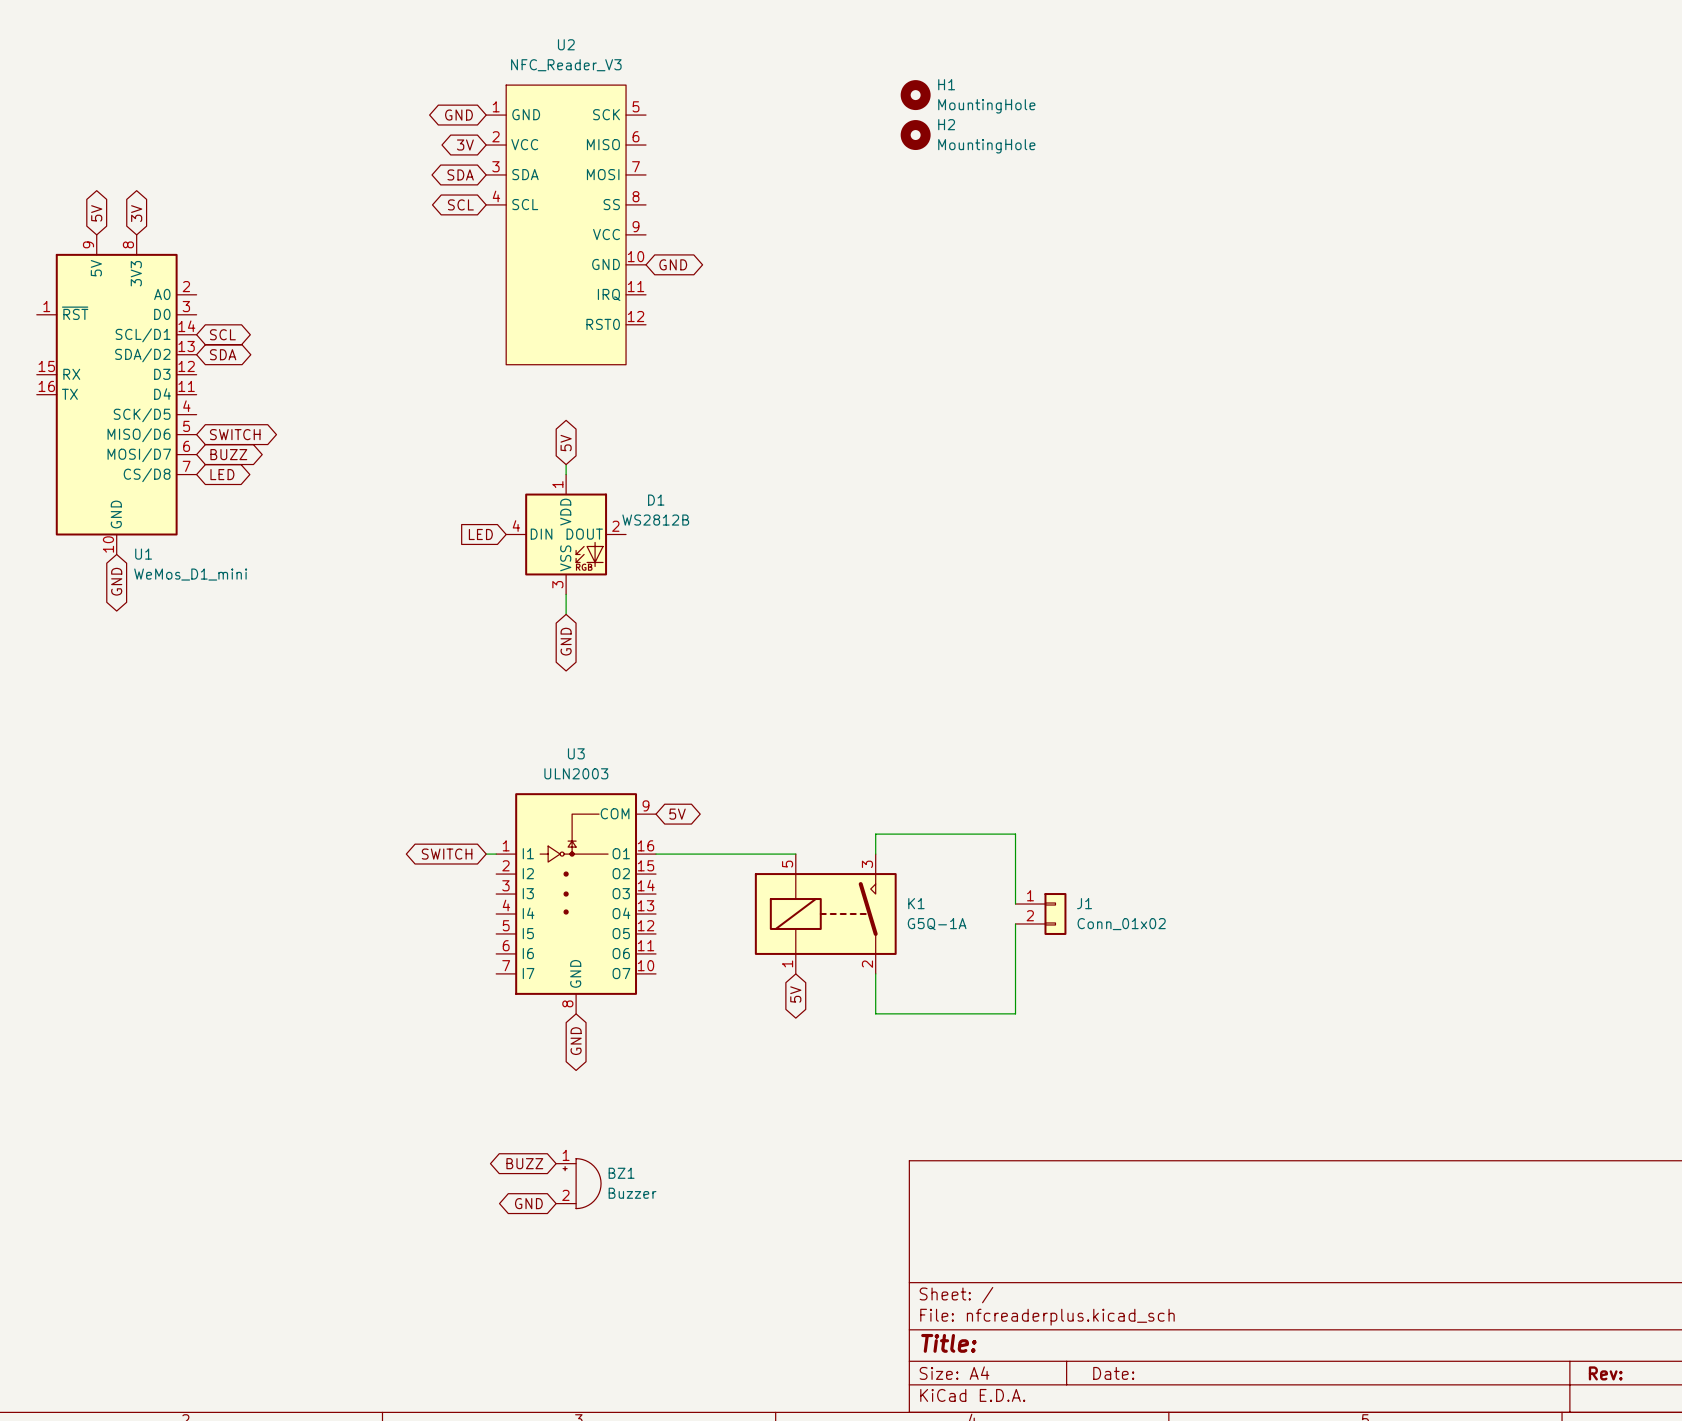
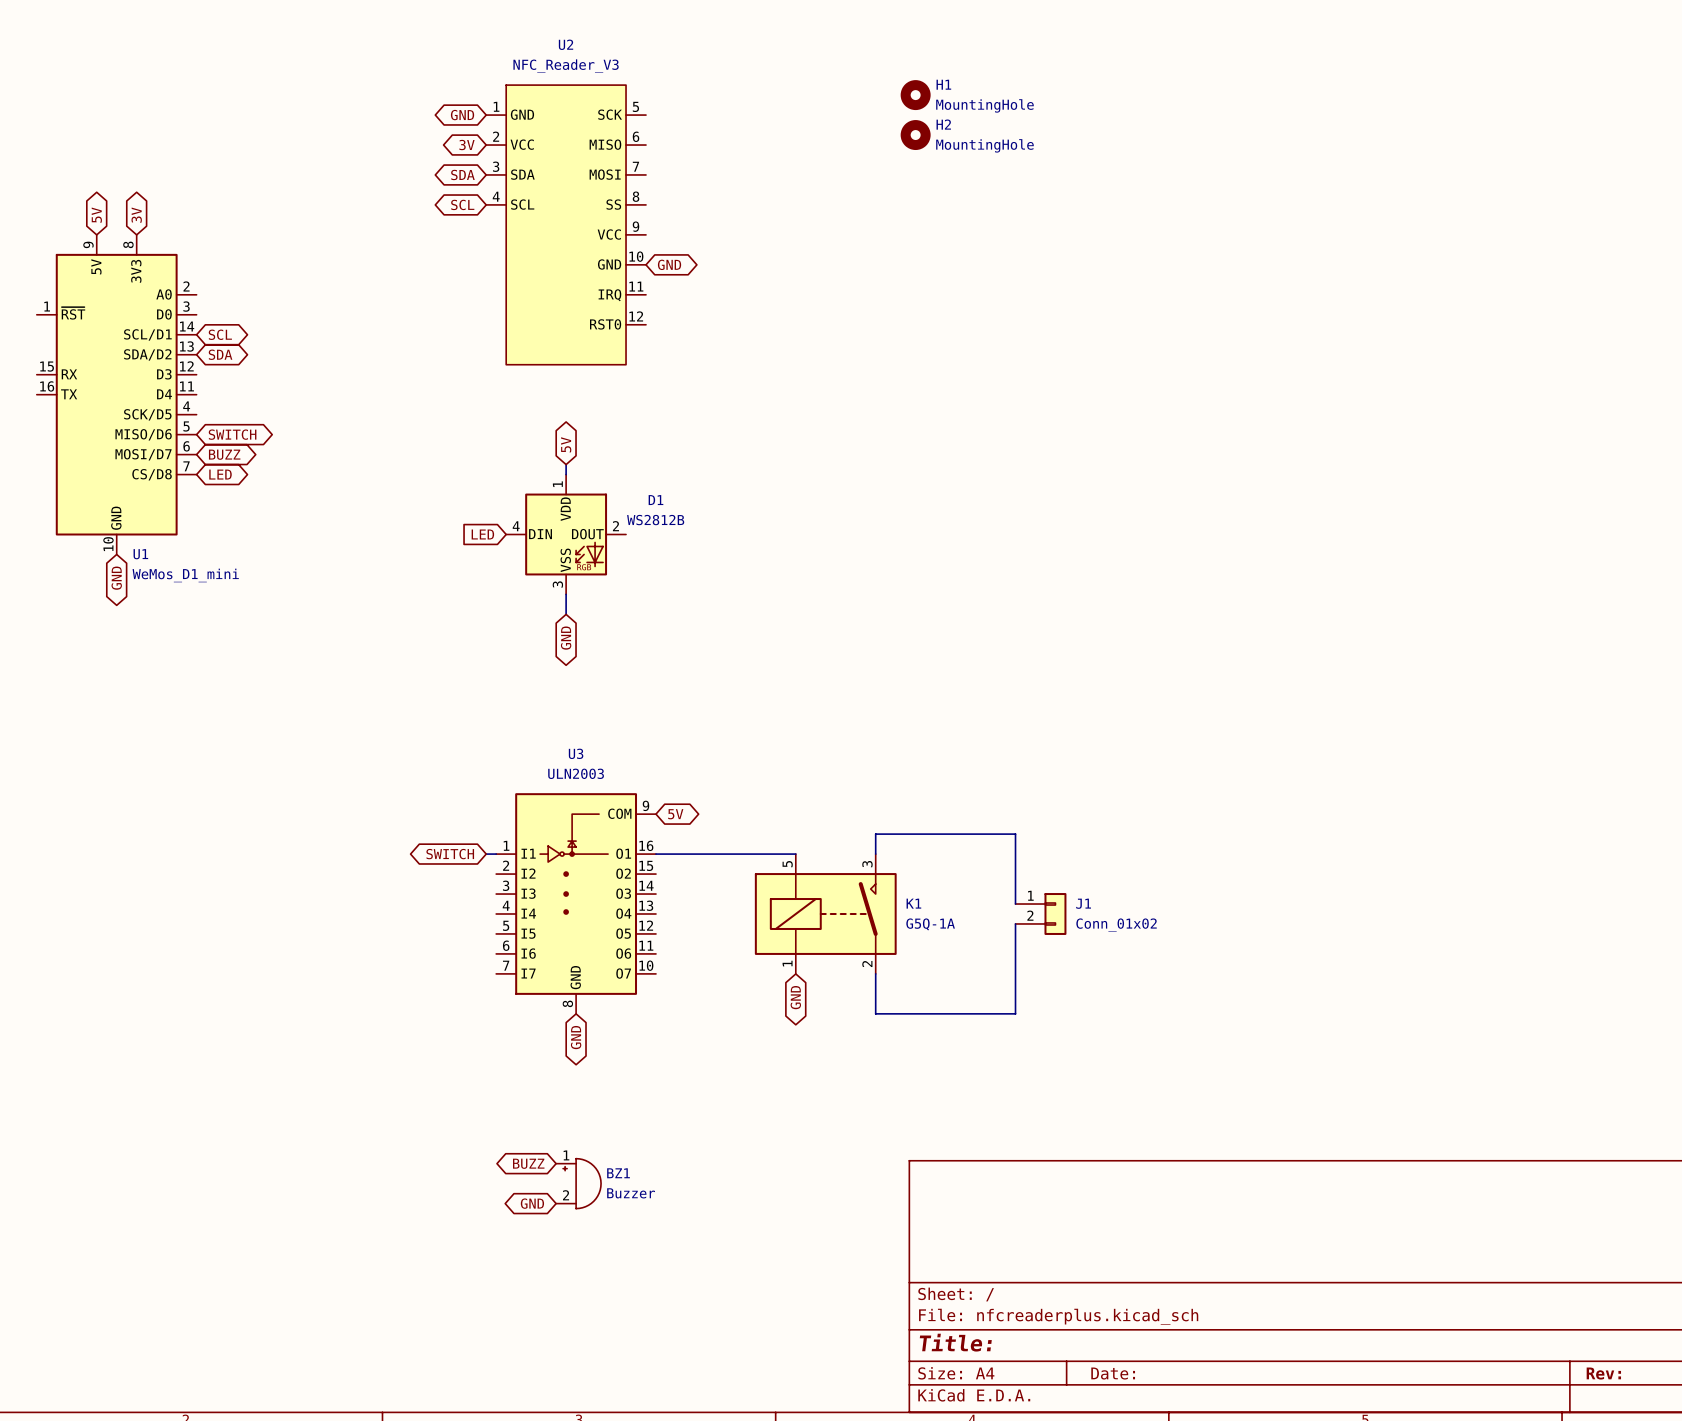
global label: 5V (795, 994) -> GND (795, 997)

